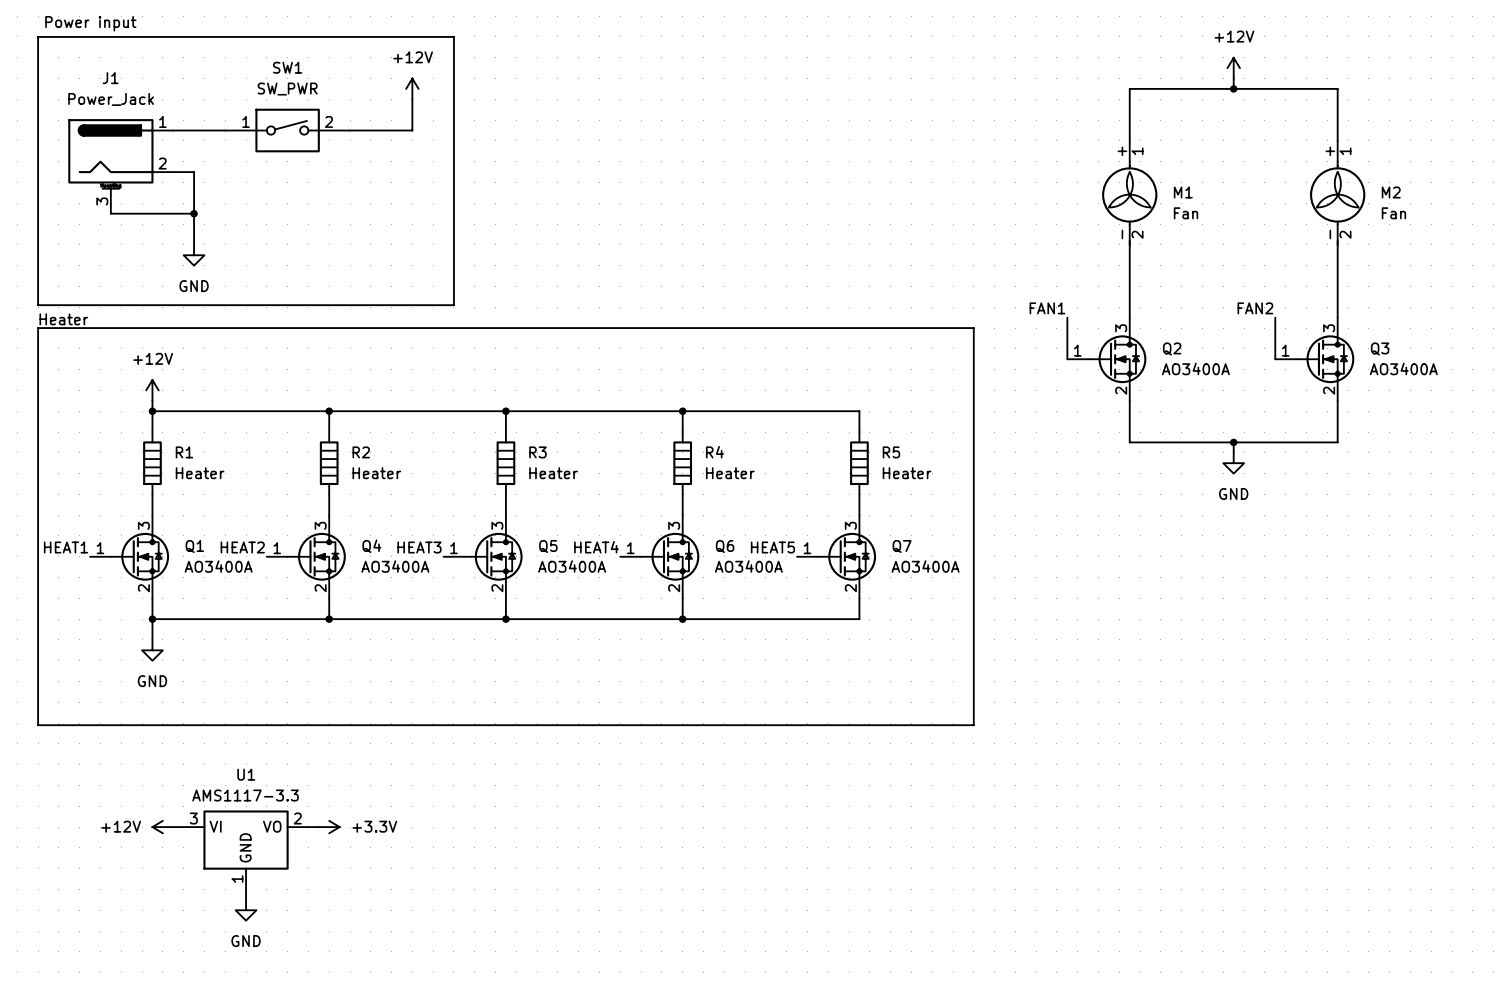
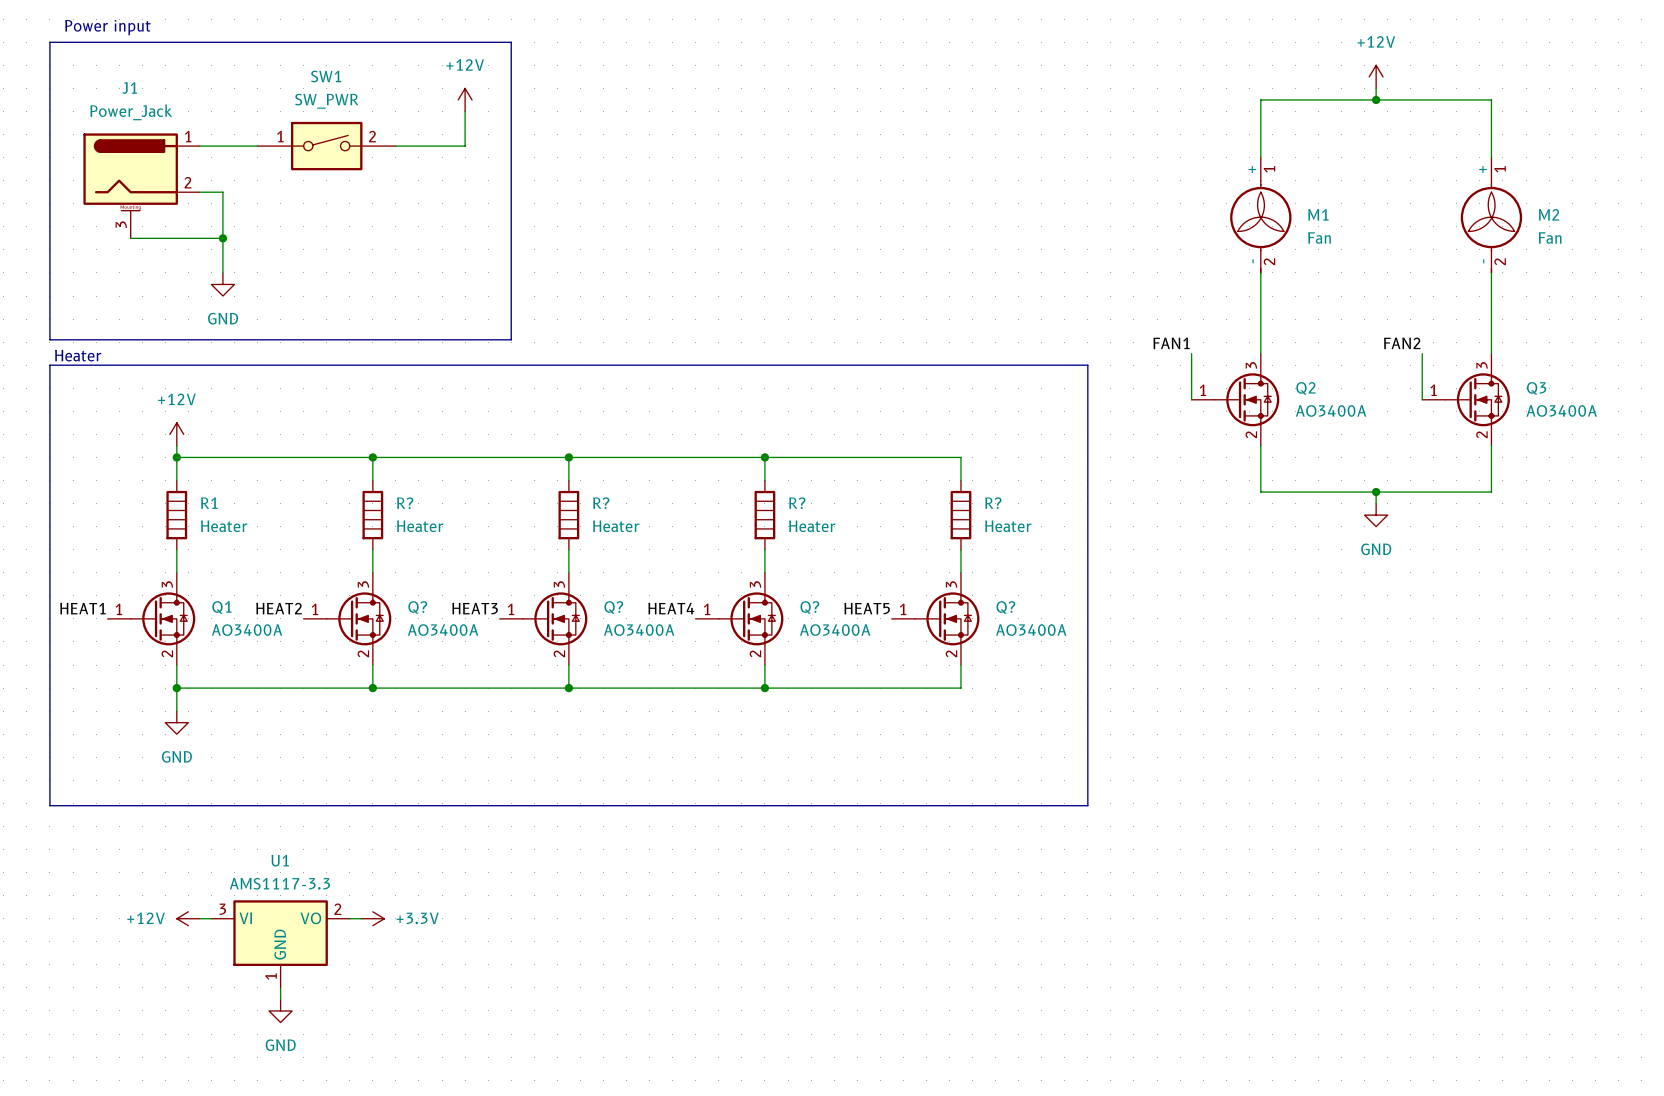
R2 name: R2 (361, 452) -> R? (405, 503)
R3 name: R3 (537, 452) -> R? (601, 503)
R4 name: R4 (714, 452) -> R? (797, 503)
R5 name: R5 (891, 452) -> R? (993, 503)
Q4 name: Q4 (371, 546) -> Q? (417, 607)
Q5 name: Q5 (548, 546) -> Q? (613, 607)
Q6 name: Q6 (725, 546) -> Q? (809, 607)
Q7 name: Q7 (902, 546) -> Q? (1005, 607)

